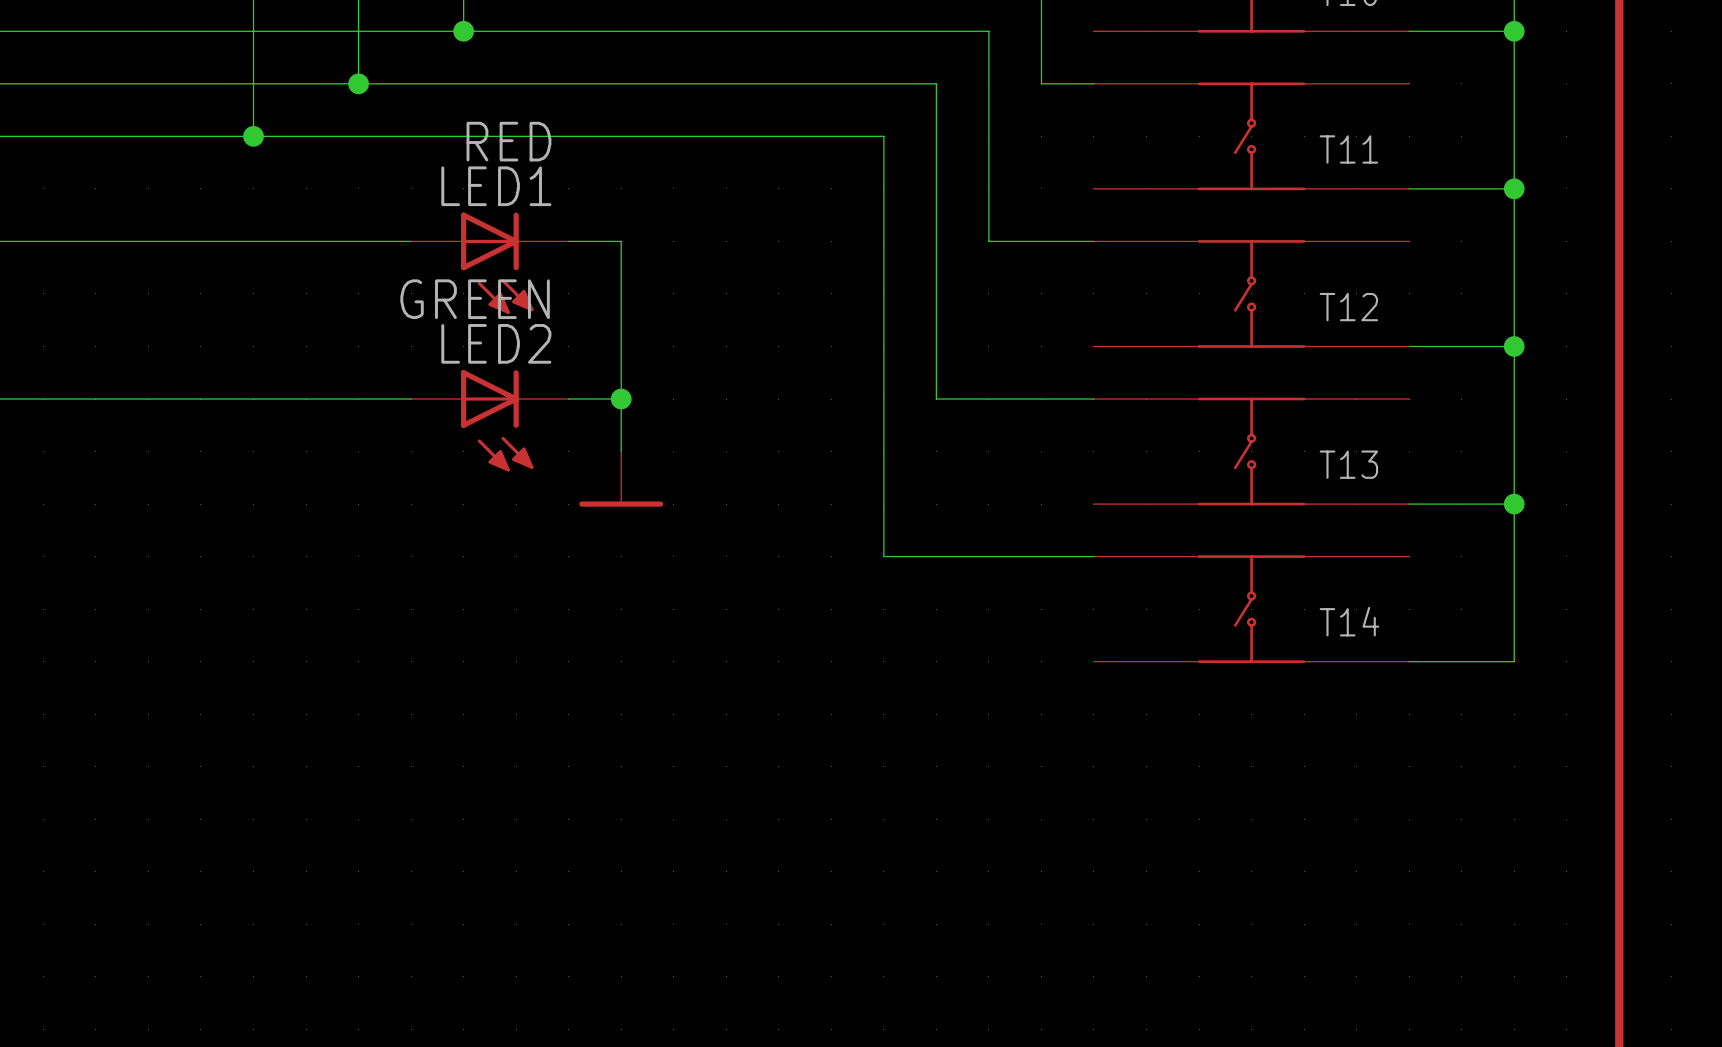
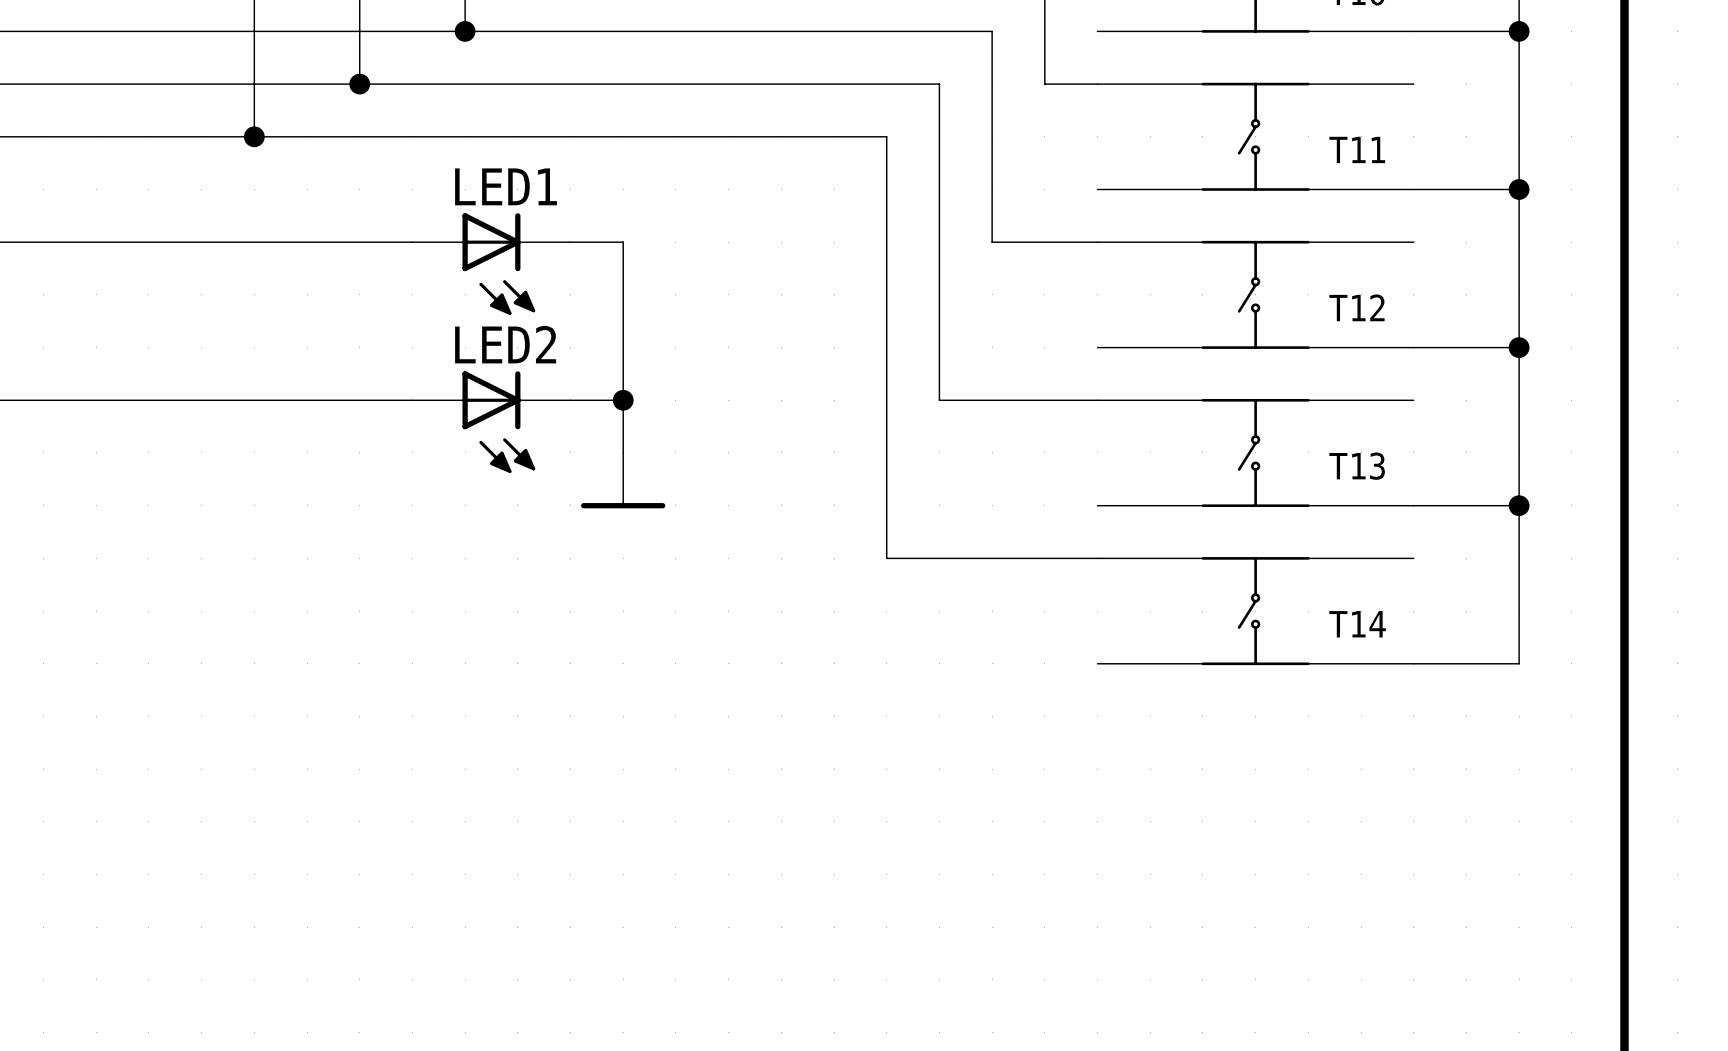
LED1 value: RED (508, 141) -> none
LED2 value: GREEN (475, 299) -> none

